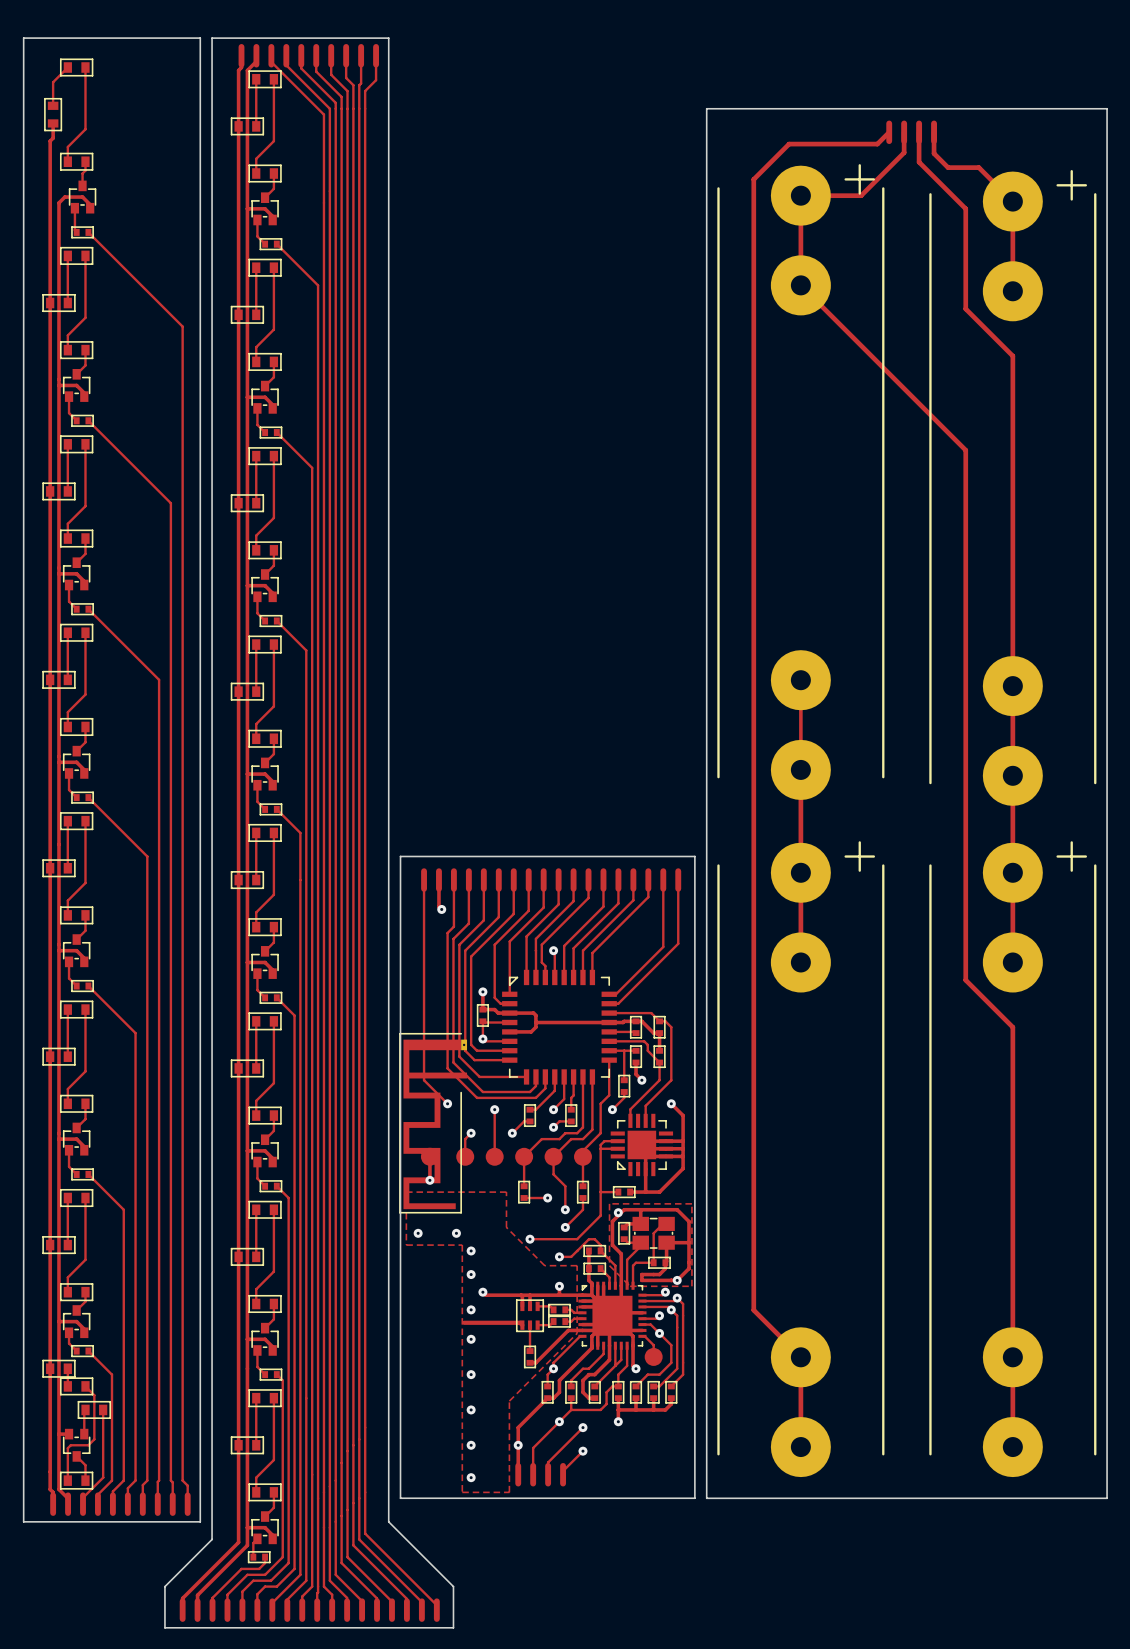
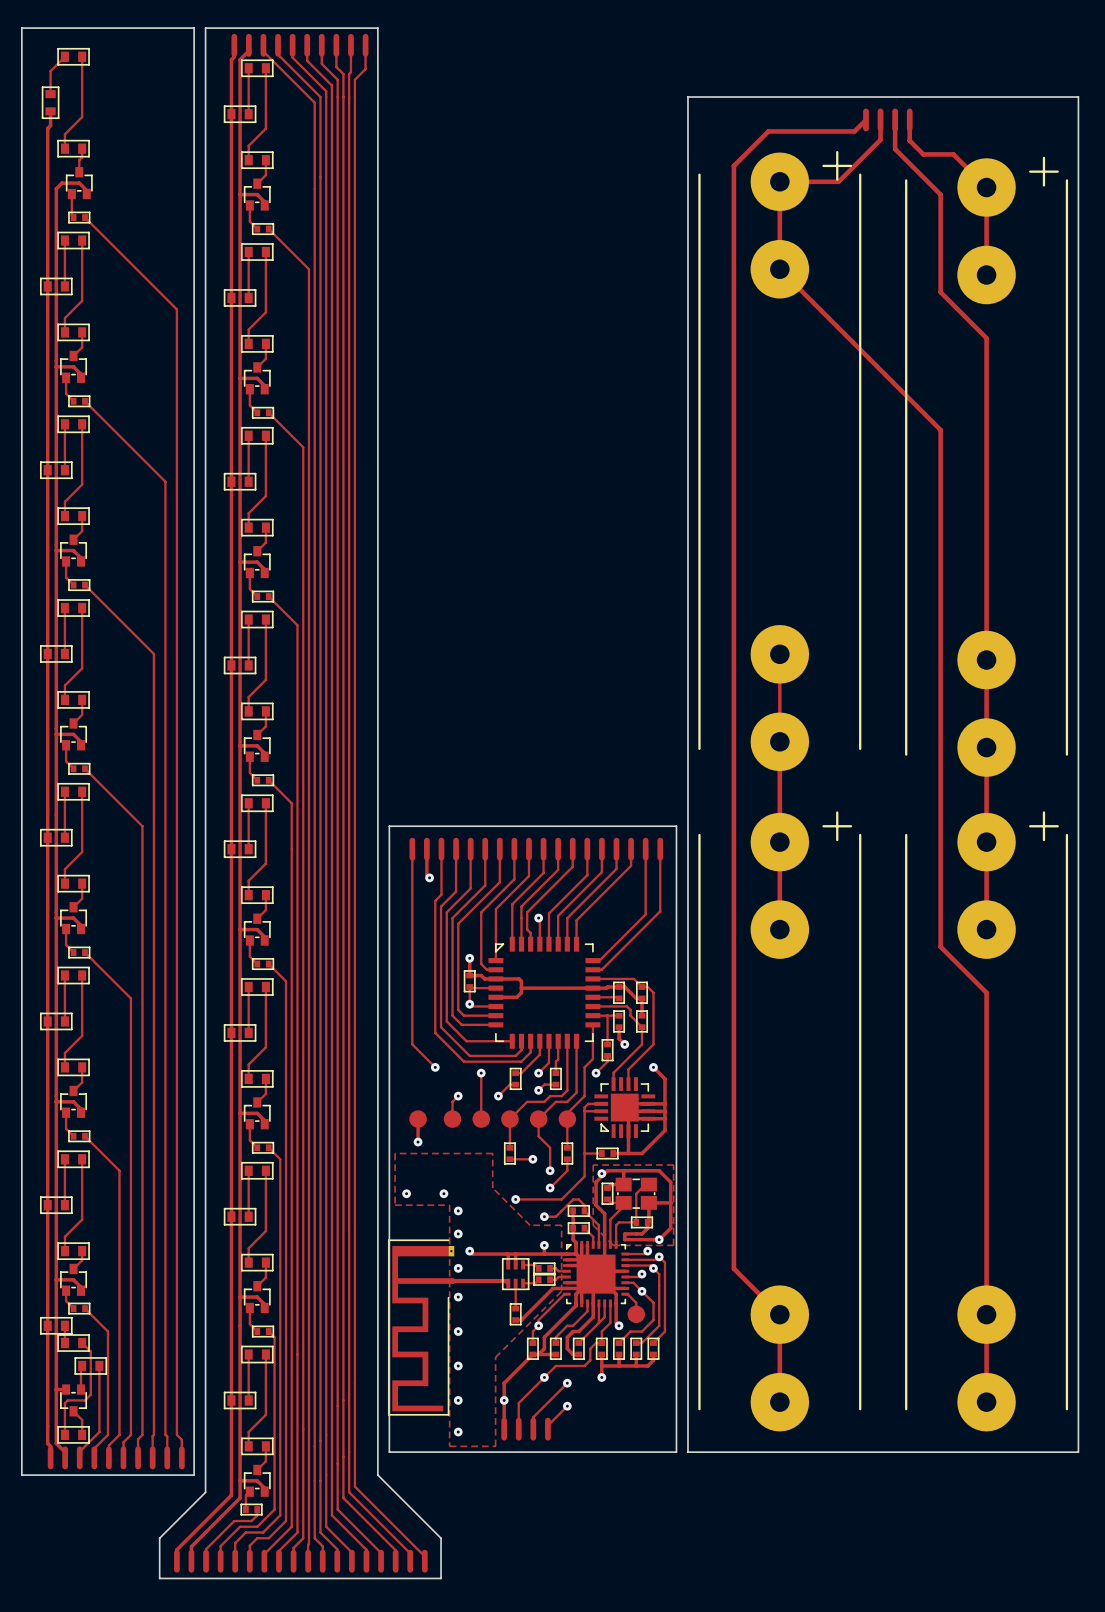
part position: (433, 1123) -> (421, 1327)
track: (571, 1398) (571, 1409) -> (555, 1354) (538, 1354)

